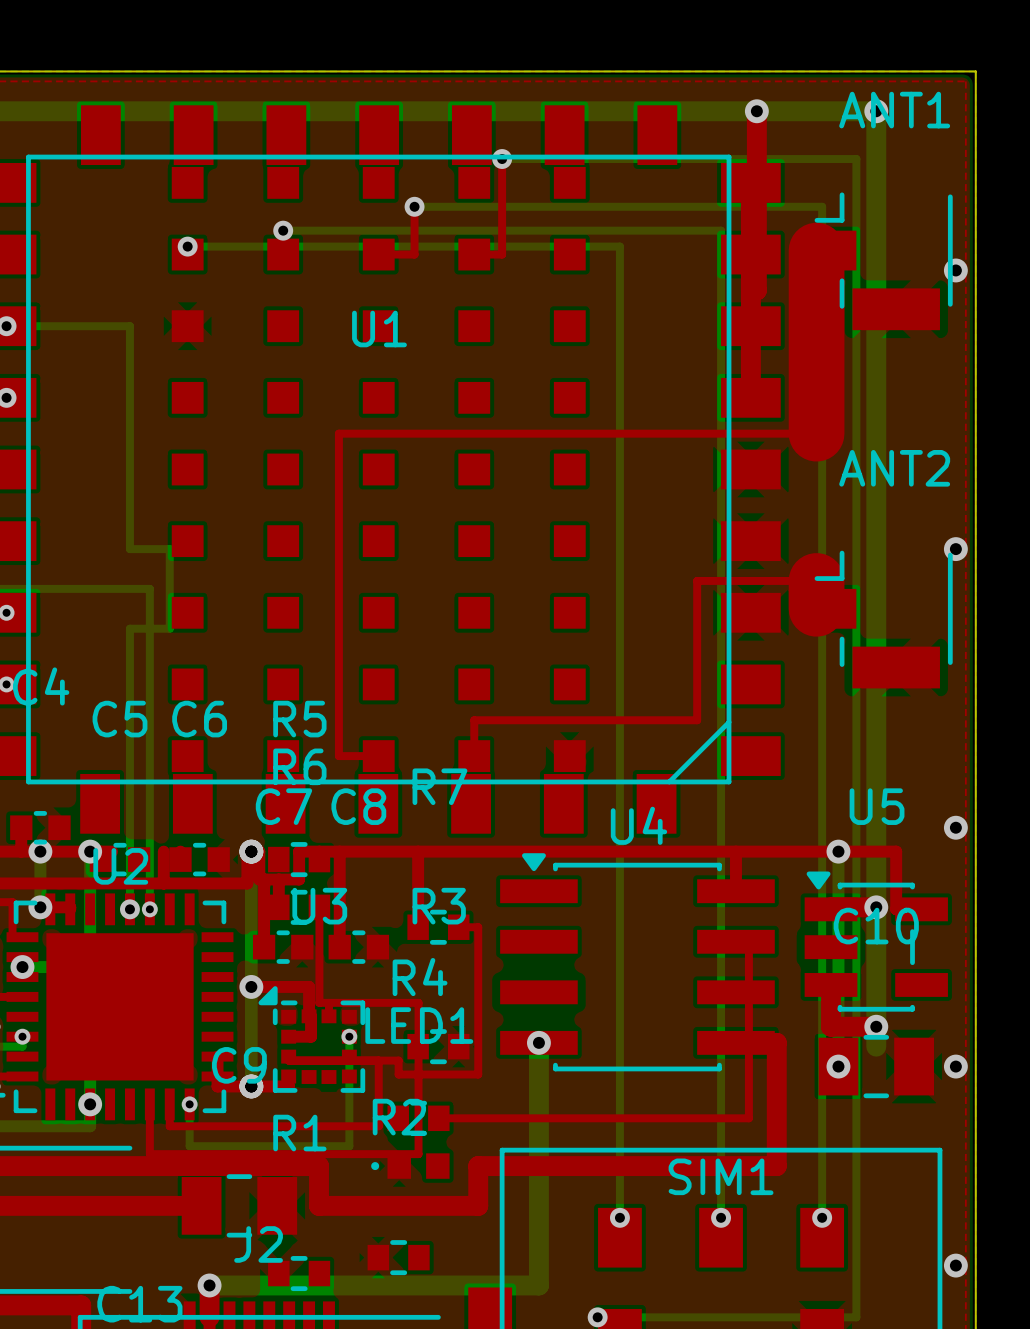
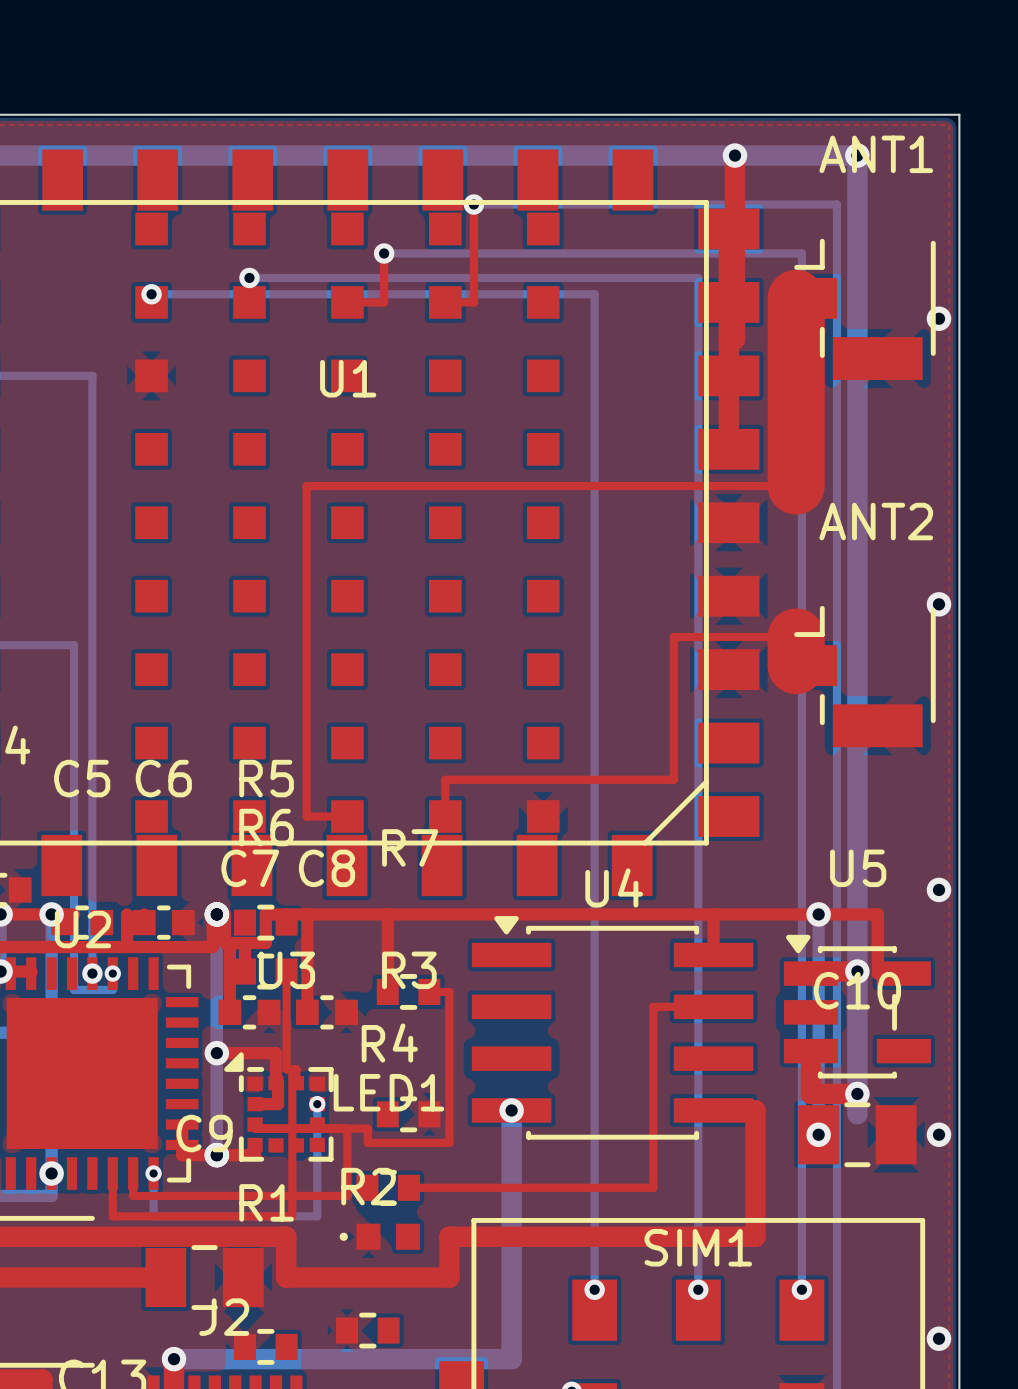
bottom track: (129, 549) (169, 549) (169, 628) (129, 628) -> (92, 604) (92, 685)
bottom track: (112, 588) (149, 588) (149, 909) -> (74, 645) (74, 989) (112, 989) (112, 973)
top track: (735, 941) (748, 941) (748, 1118) (677, 1118) -> (713, 1006) (653, 1006) (653, 1187)
top track: (328, 1002) (418, 1002) (418, 1154) (149, 1154) (149, 1146) -> (292, 1069) (292, 1216) (112, 1216)

